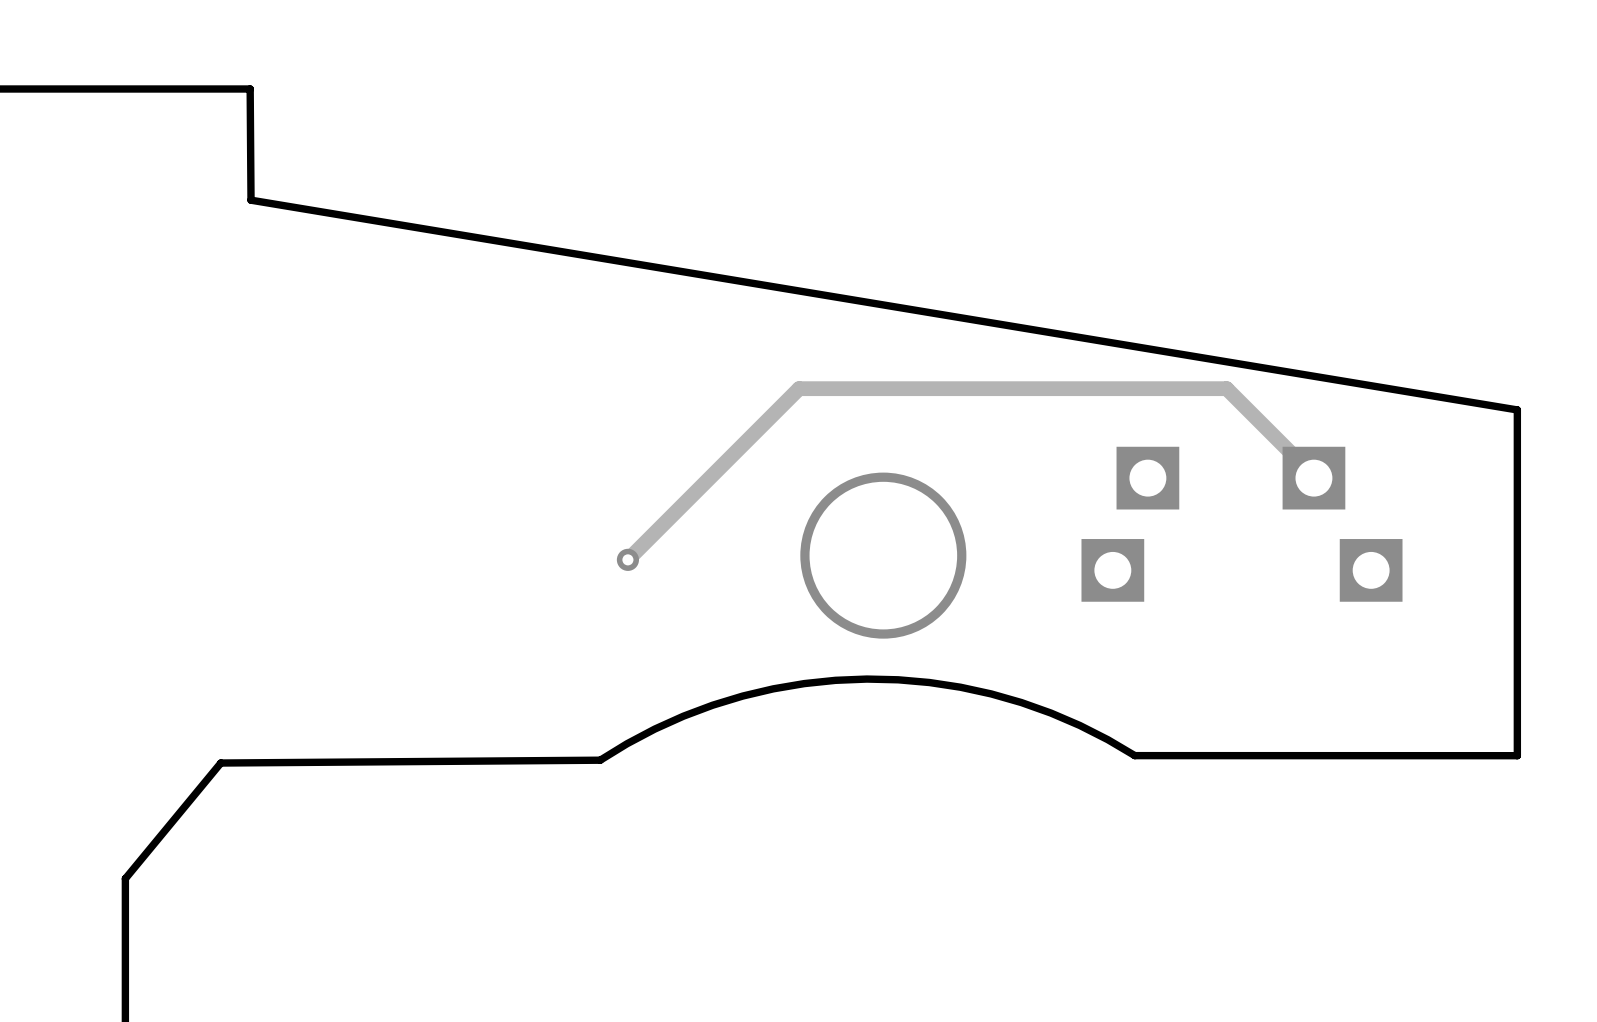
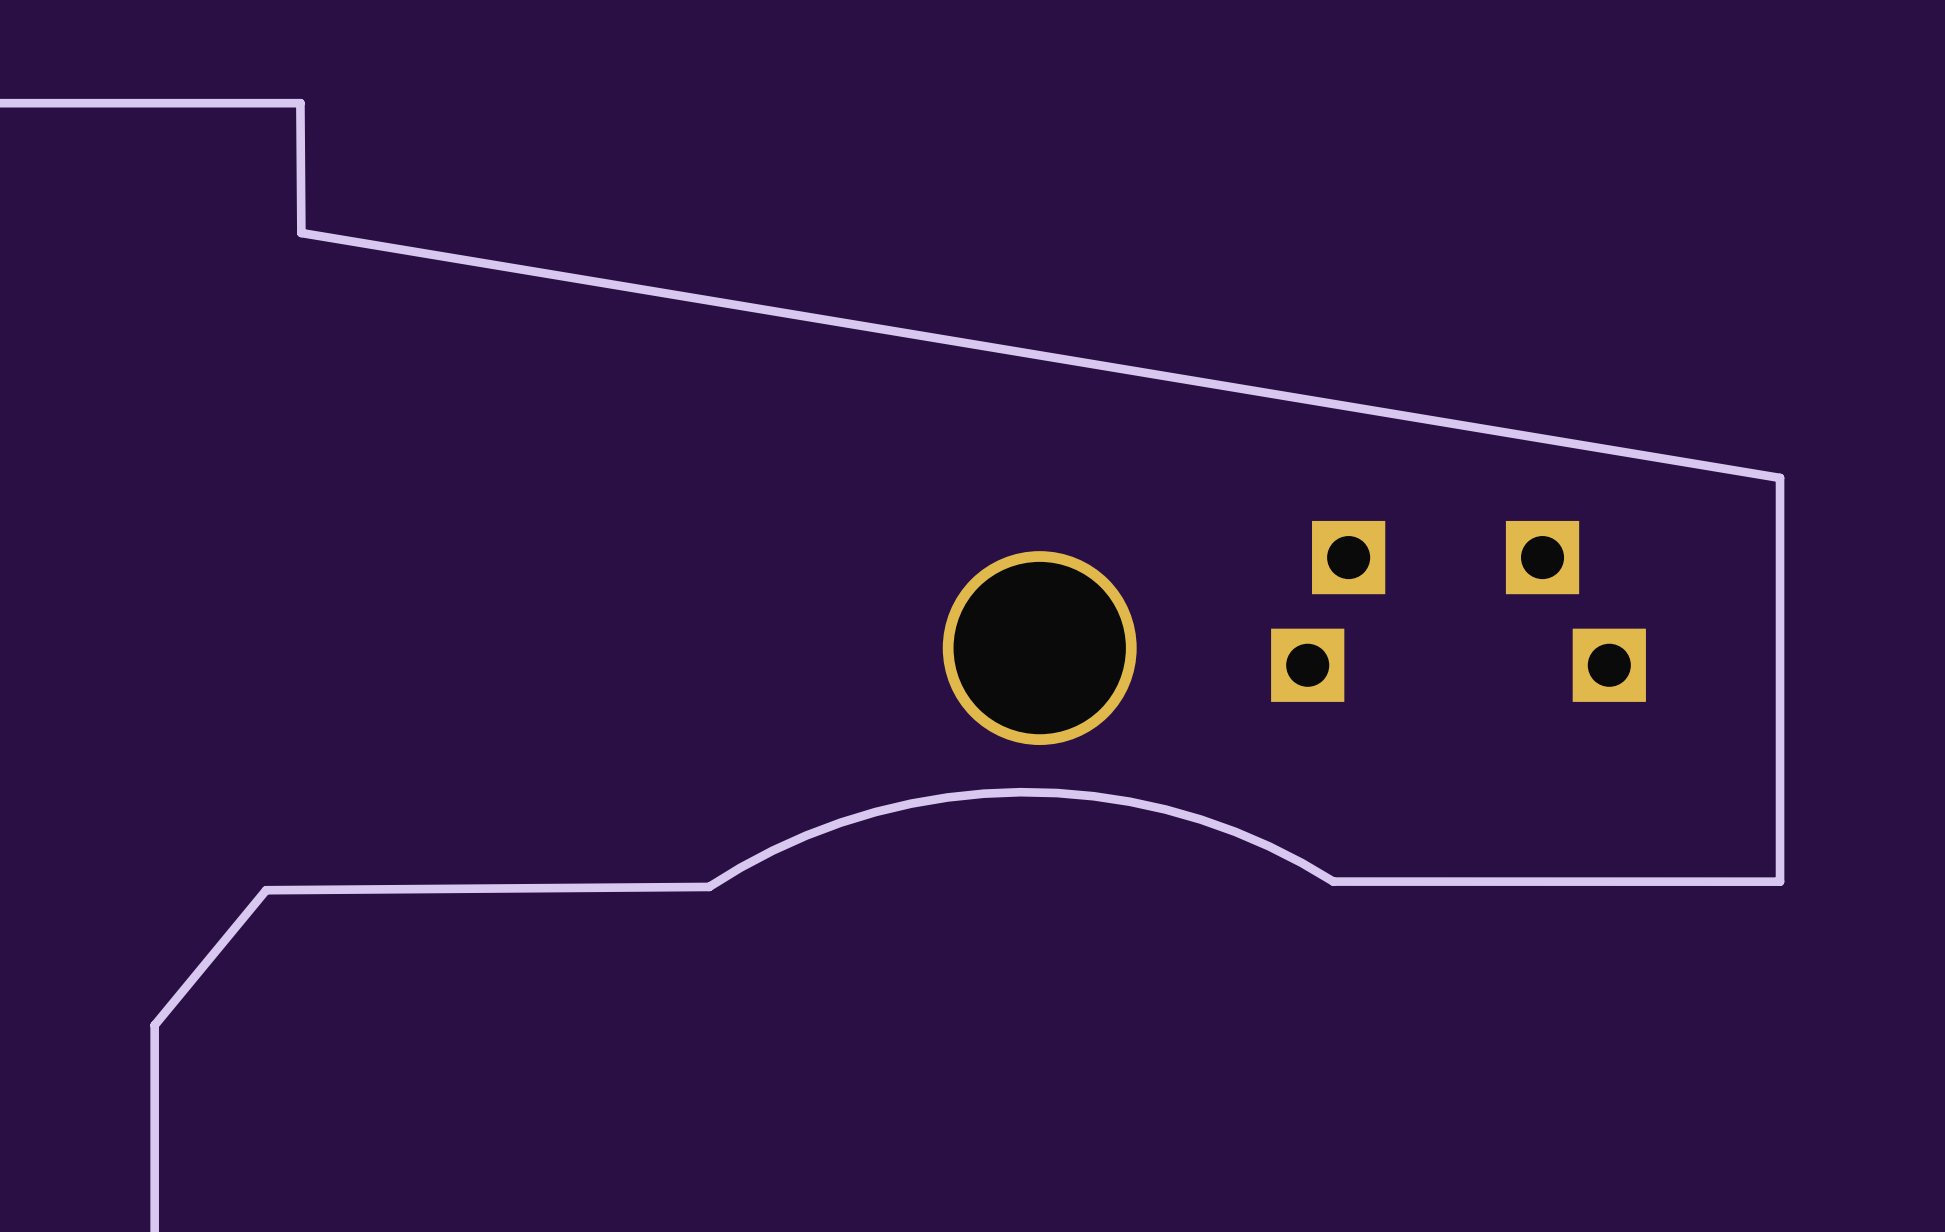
track: (1313, 475) (1226, 388) (799, 388) (627, 559) -> none
via: (627, 559) -> none

